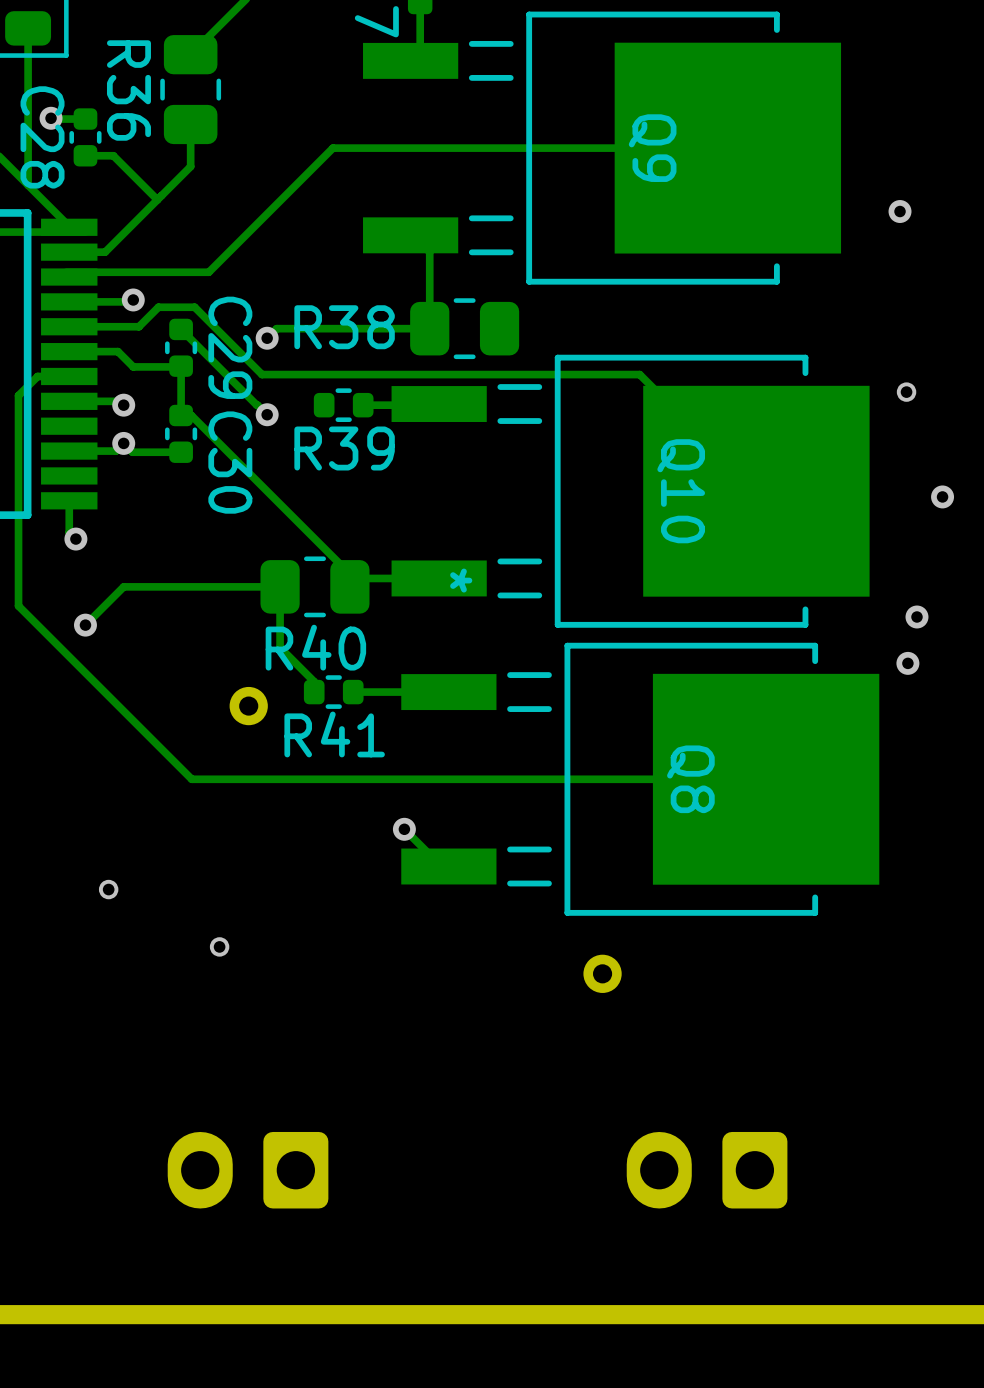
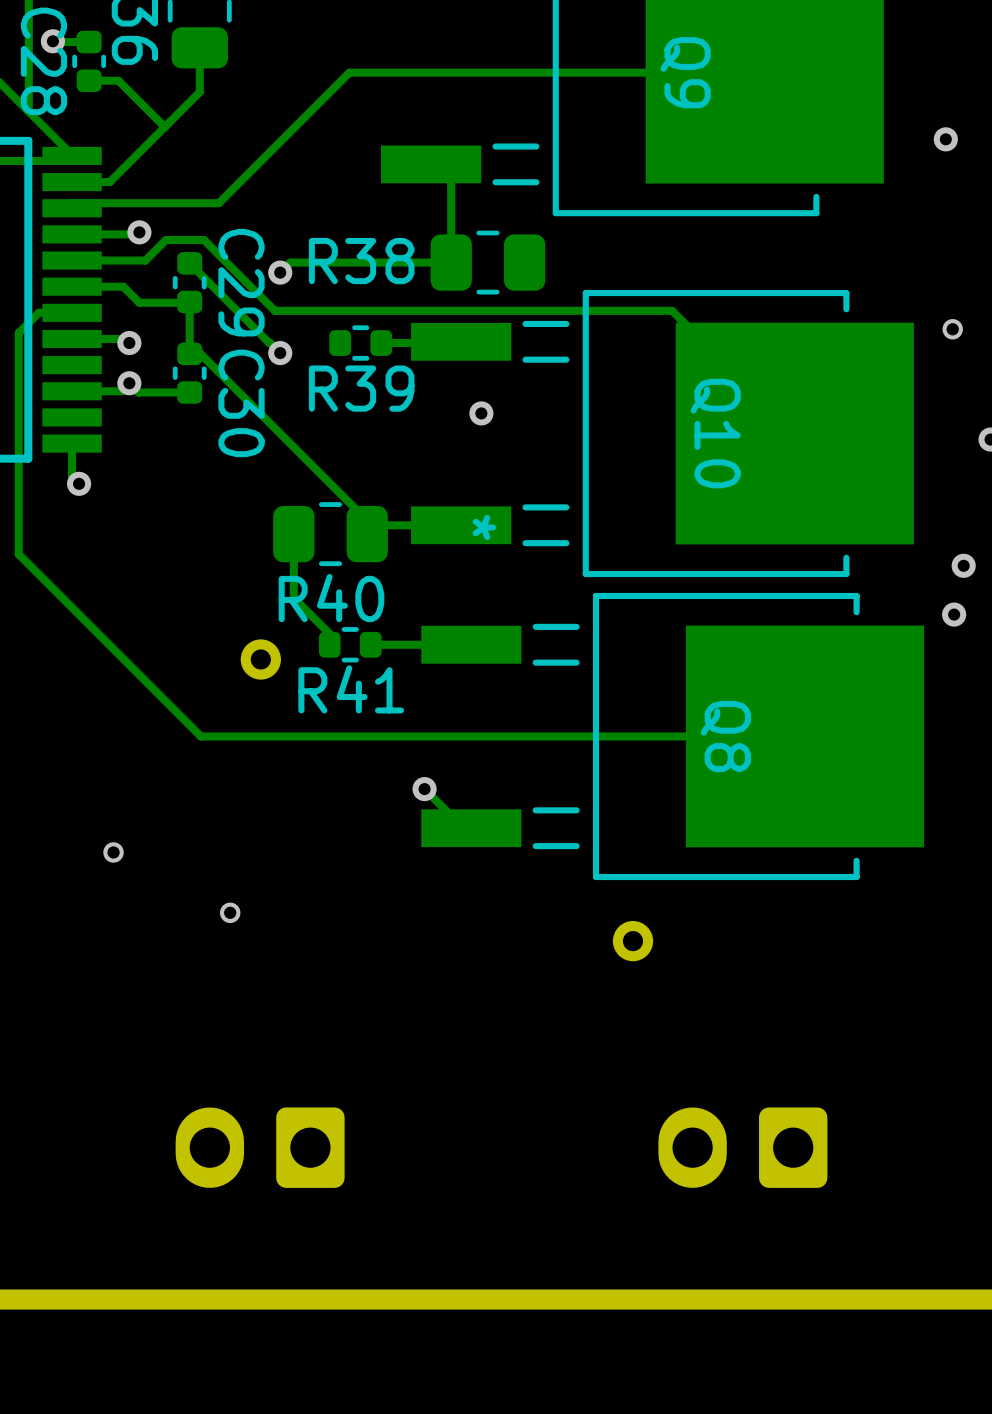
via: none -> (481, 413)
track: (280, 586) (123, 586) (85, 625) -> none
via: (85, 625) -> none

